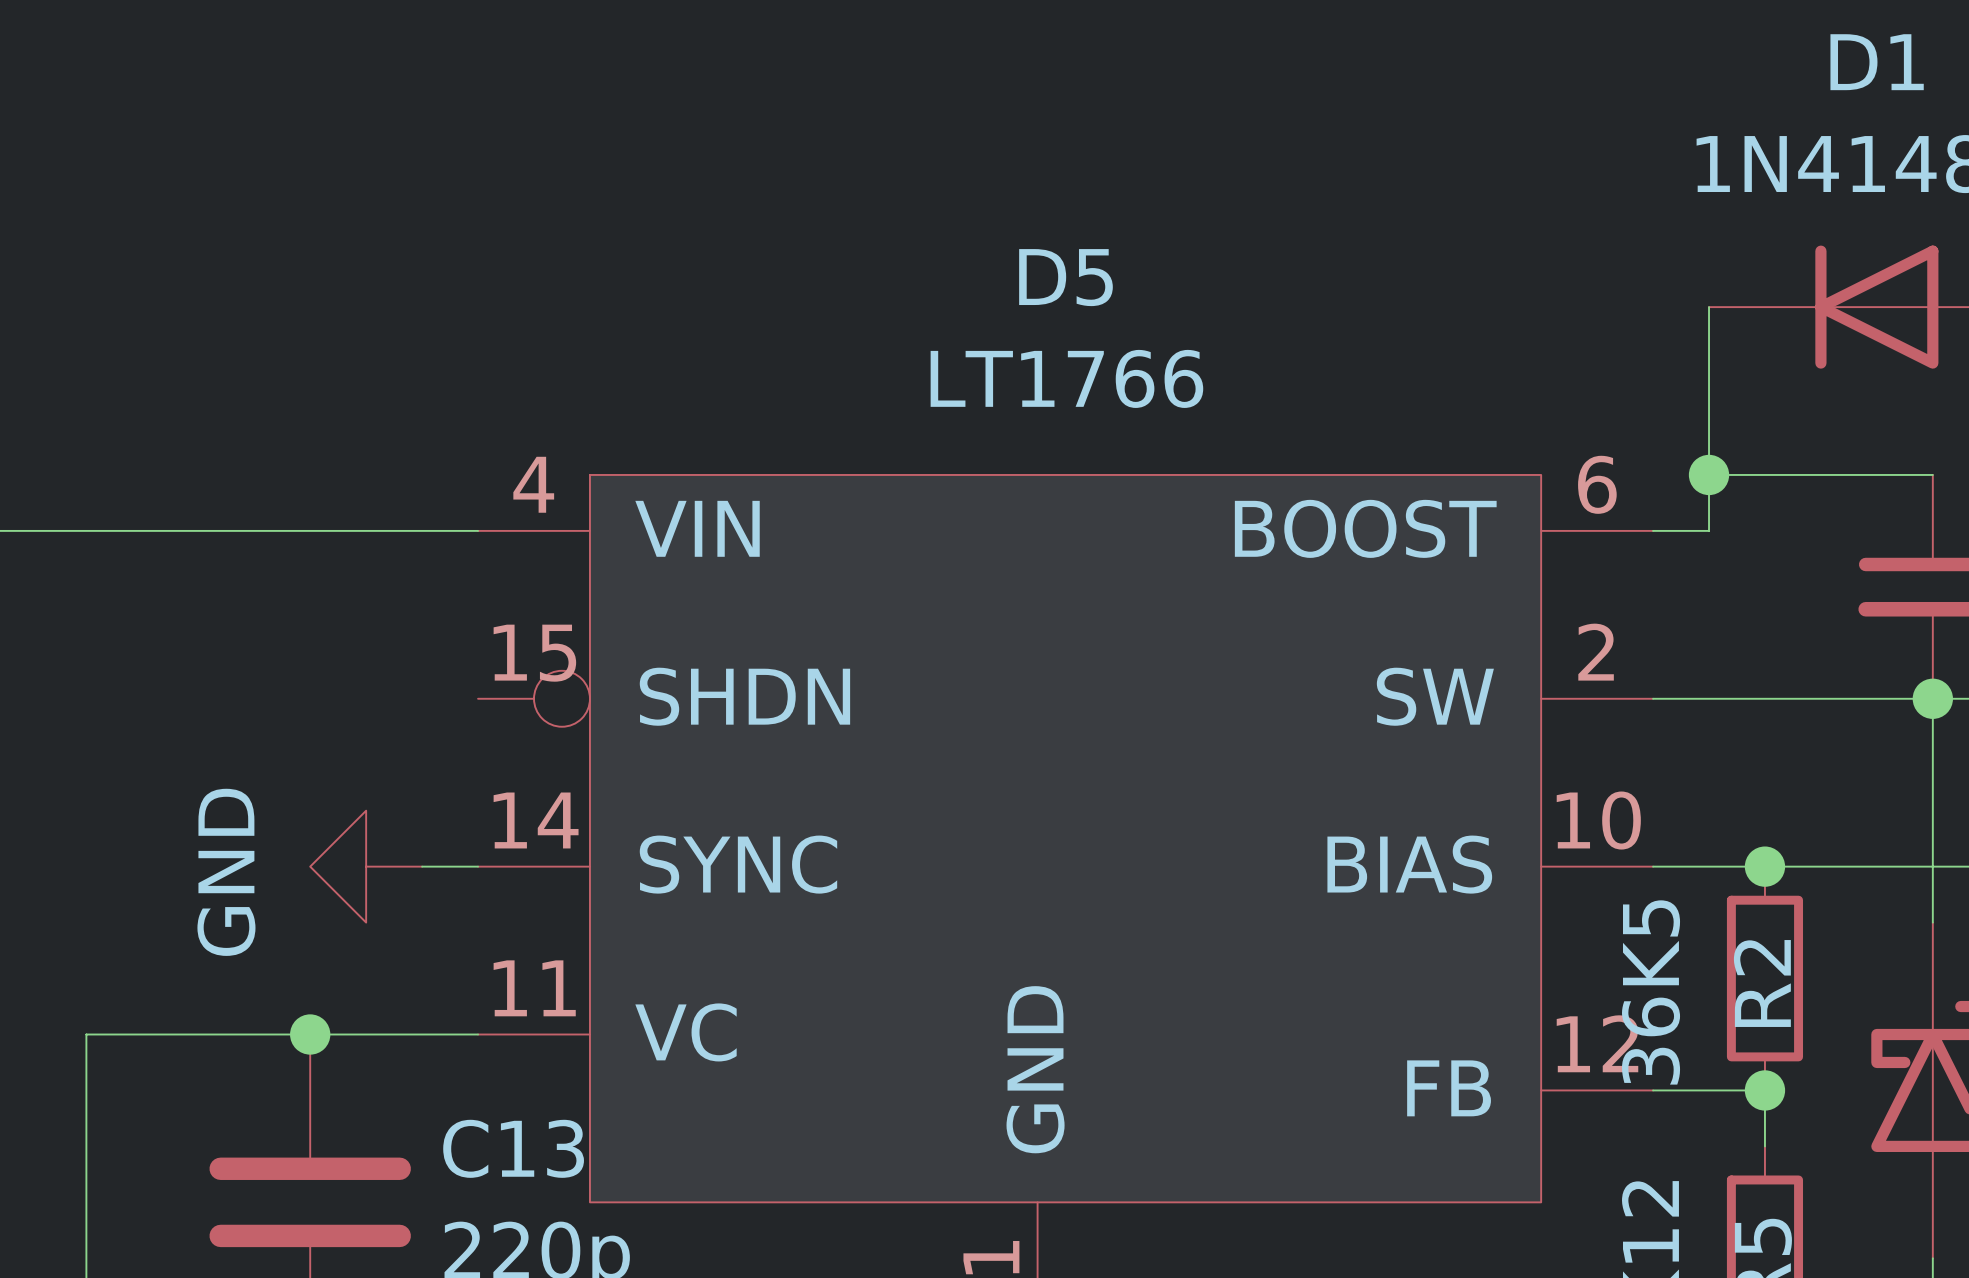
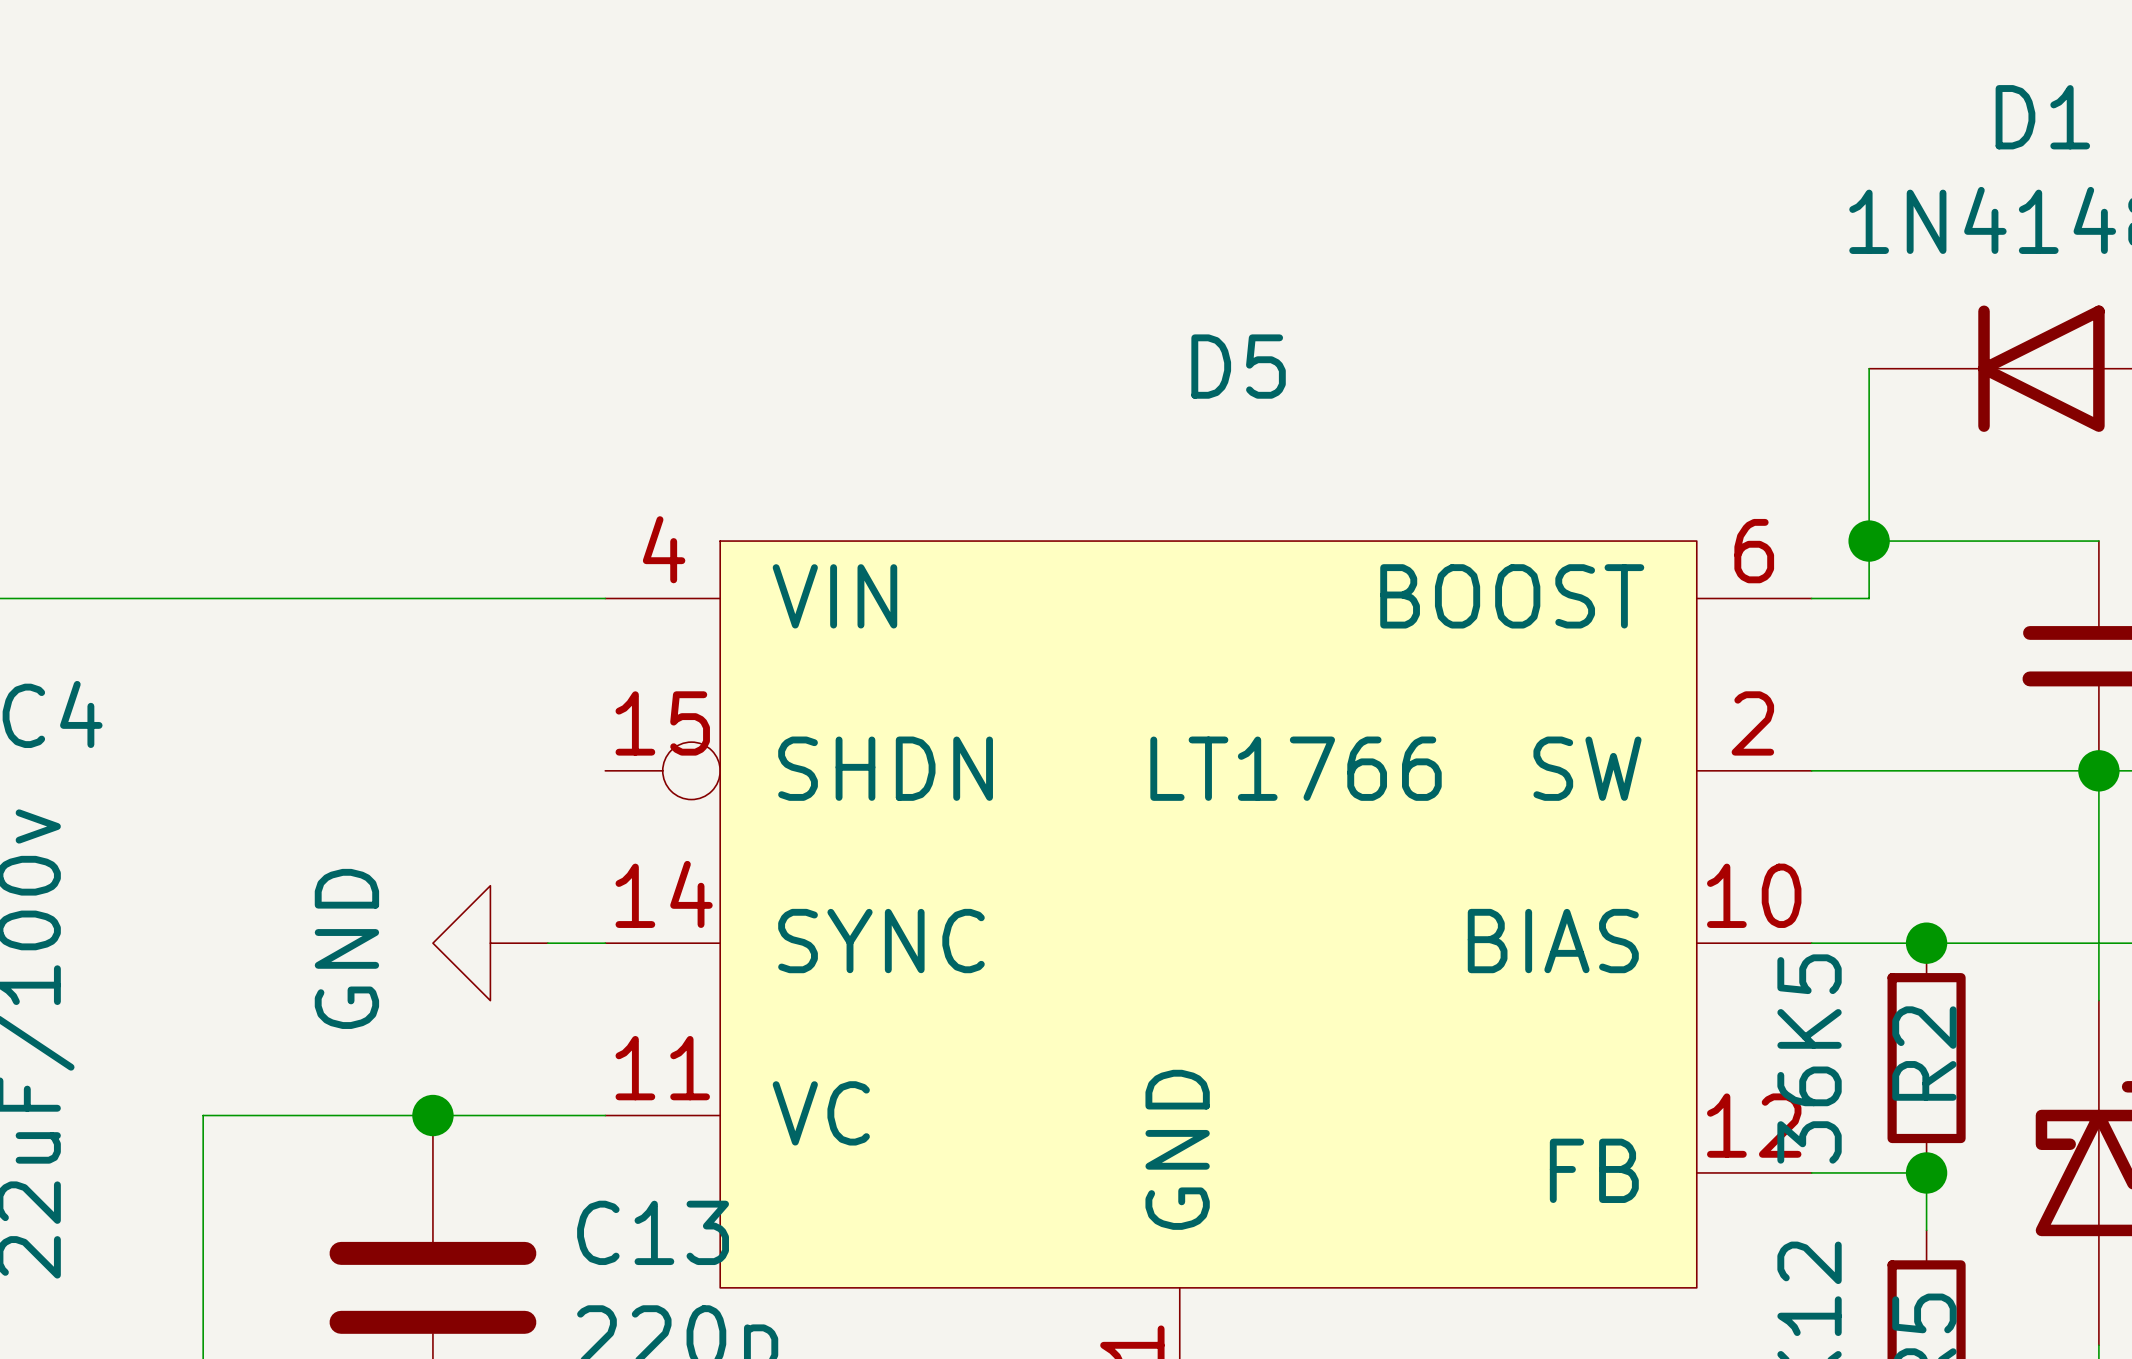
D5 name position: D5 (1065, 277) -> D5 (1238, 366)
D5 value position: LT1766 (1066, 378) -> LT1766 (1296, 768)

